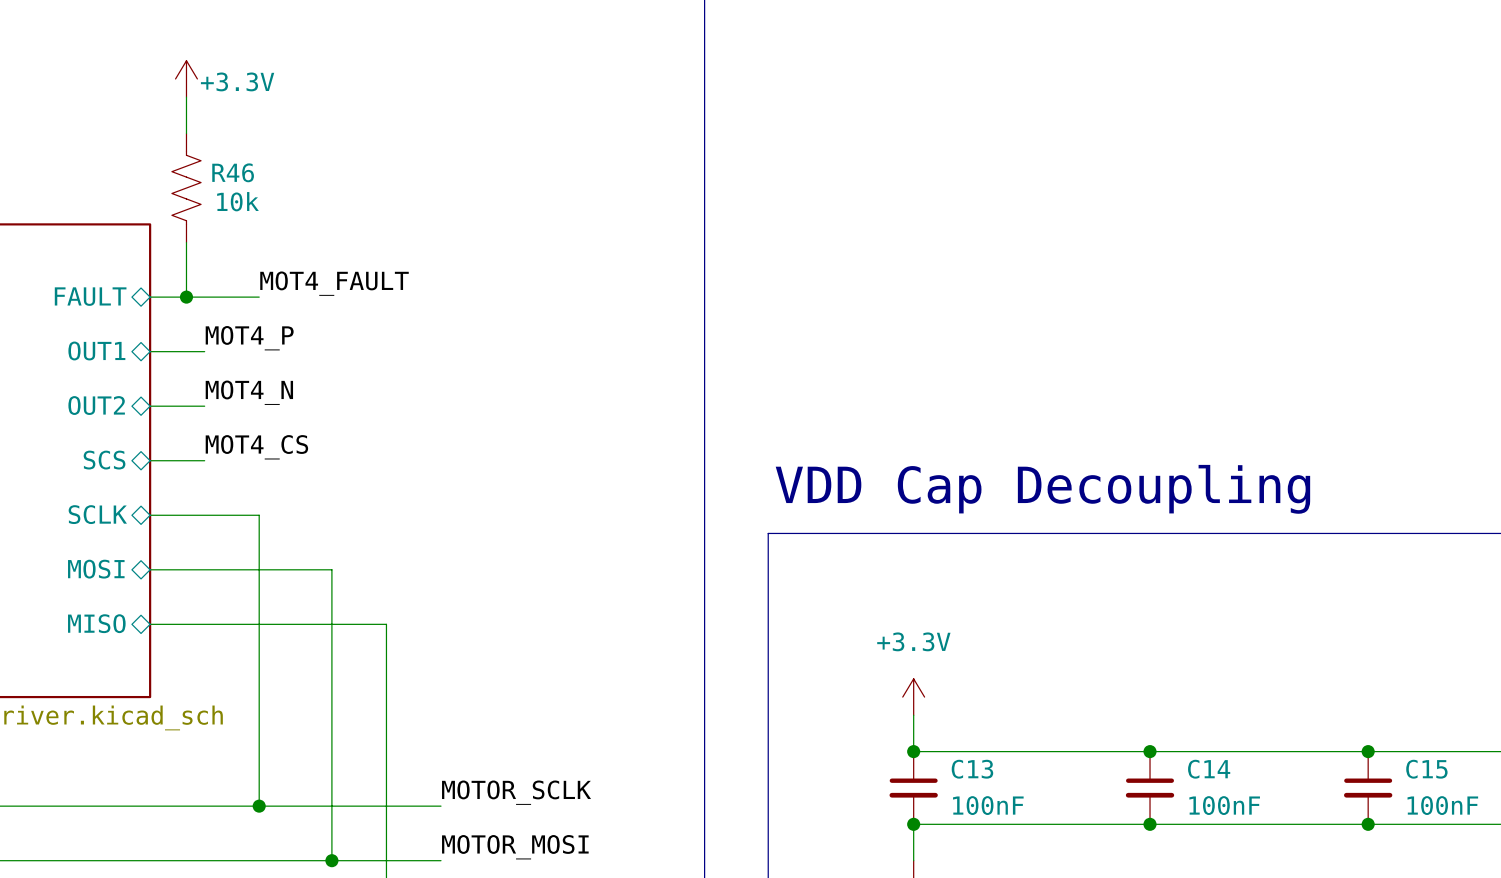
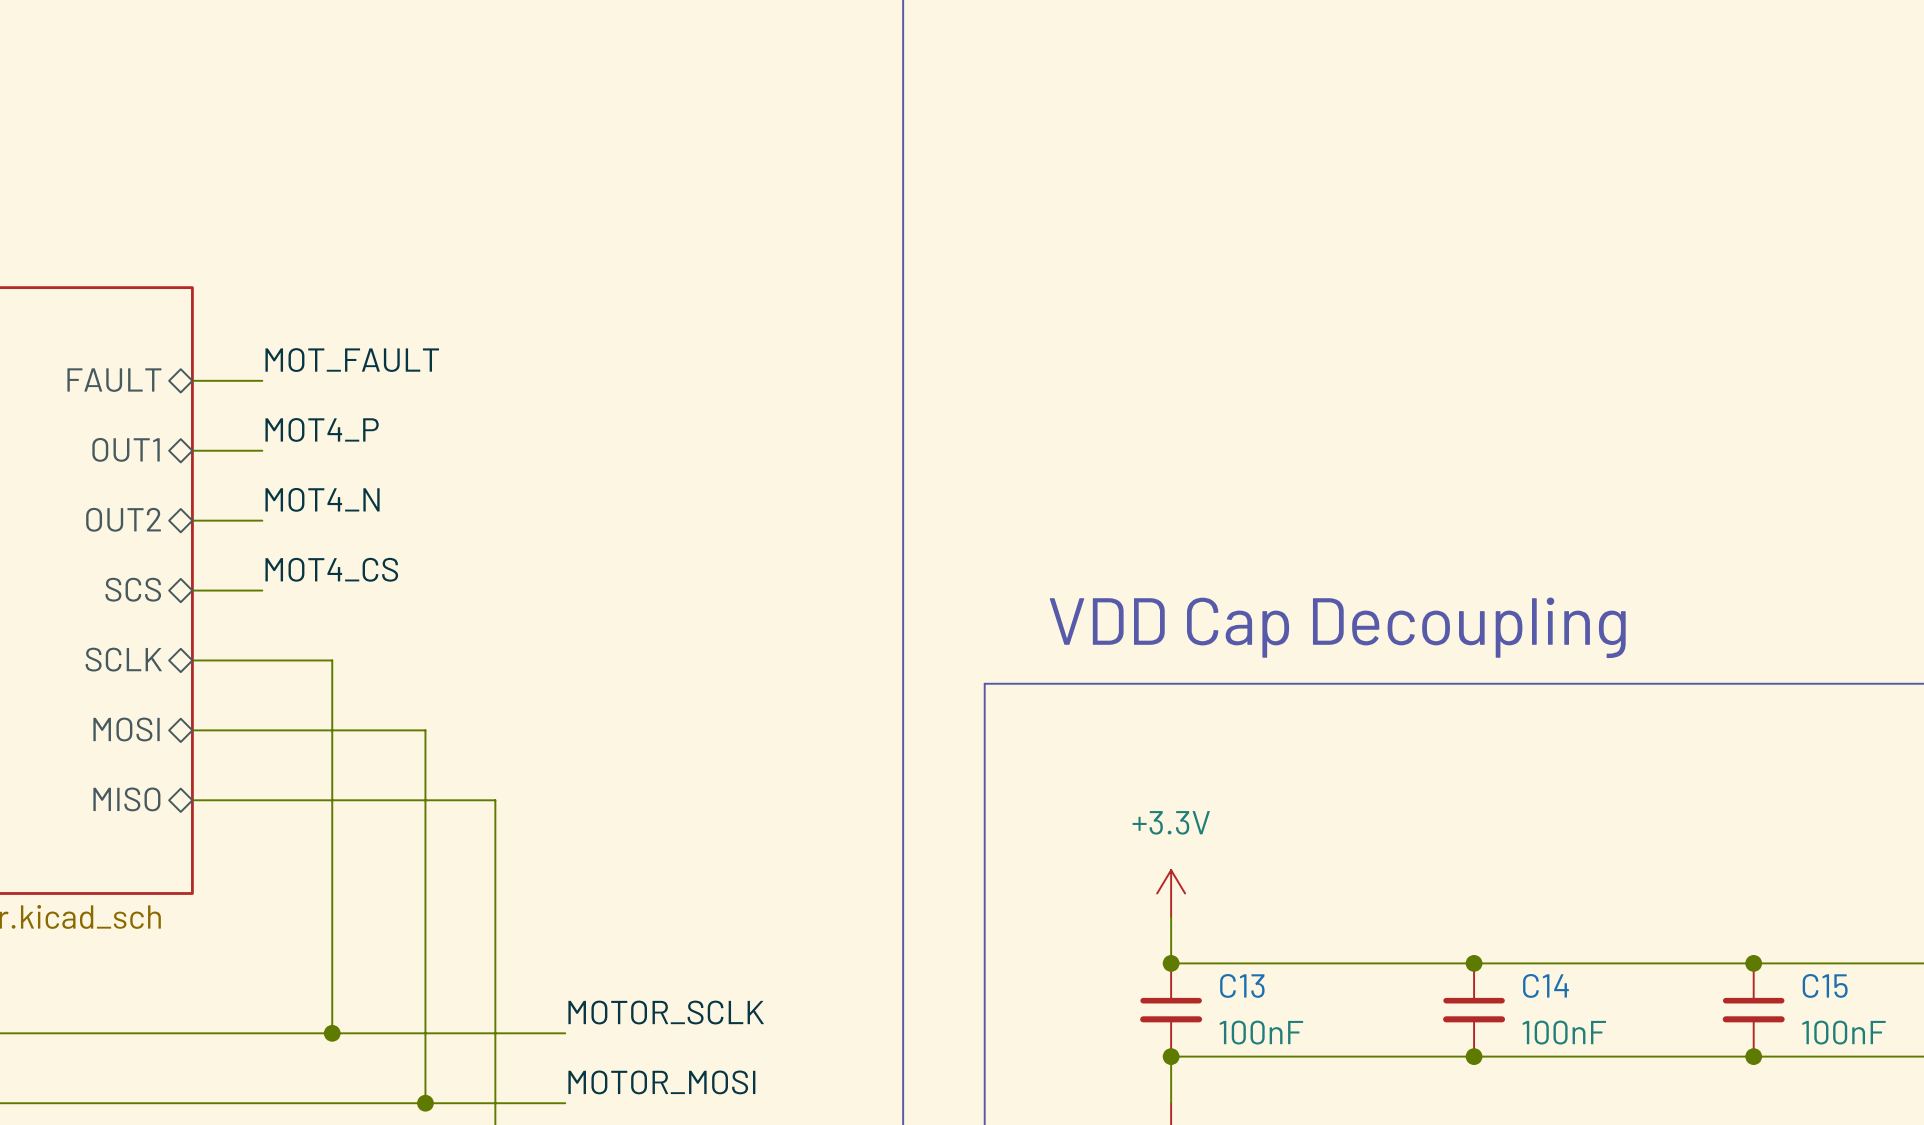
power symbol: +3.3V (186, 78) -> none
wire: (186, 97) (186, 133) -> none
R46: 10k (186, 188) -> none
wire: (186, 242) (186, 297) -> none
label: MOT4_FAULT (334, 283) -> MOT_FAULT (352, 360)
junction: (186, 297) -> none
wire: (204, 297) (259, 297) -> none

